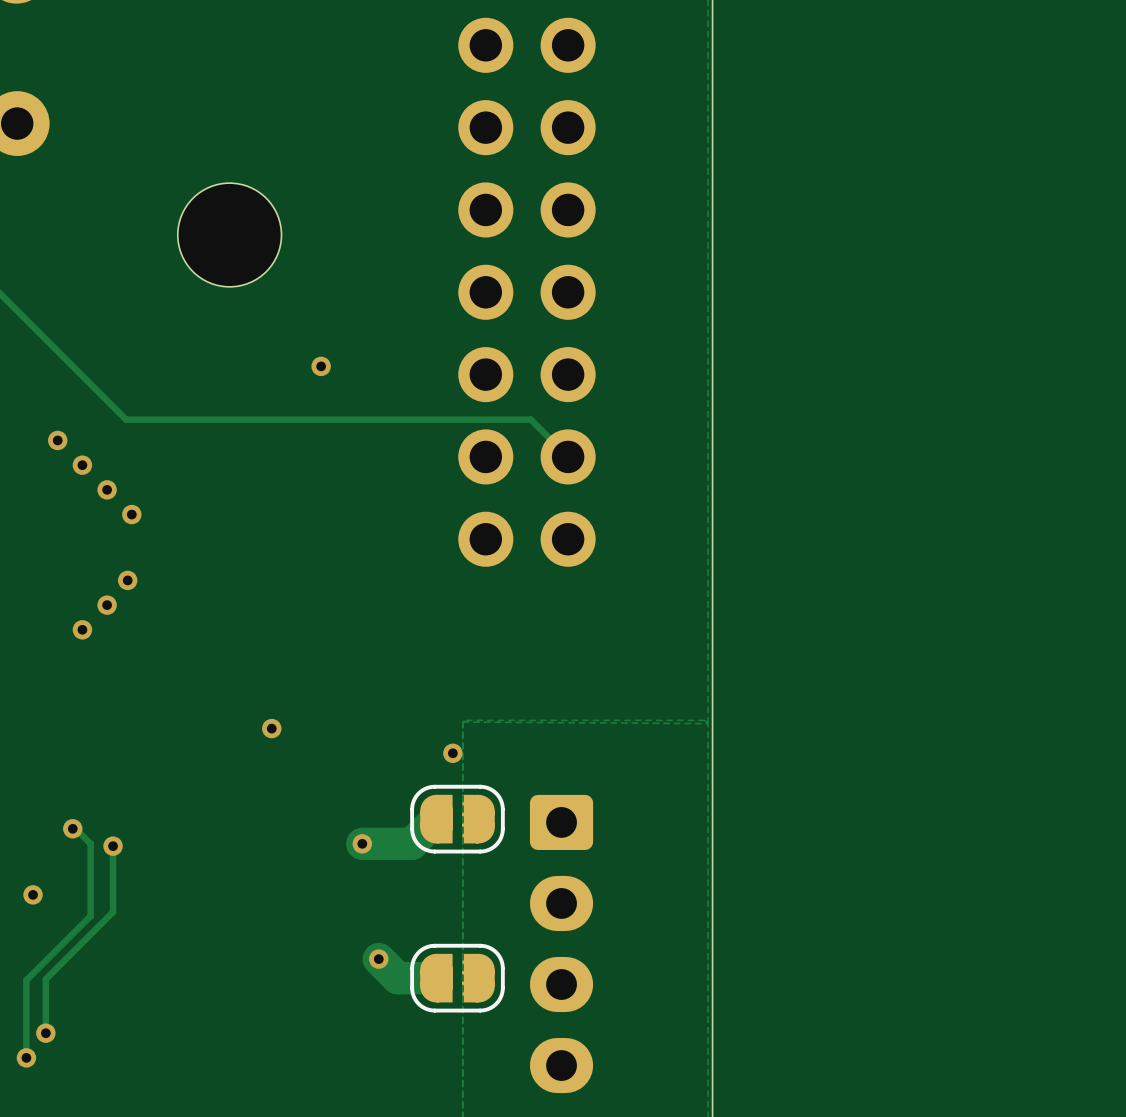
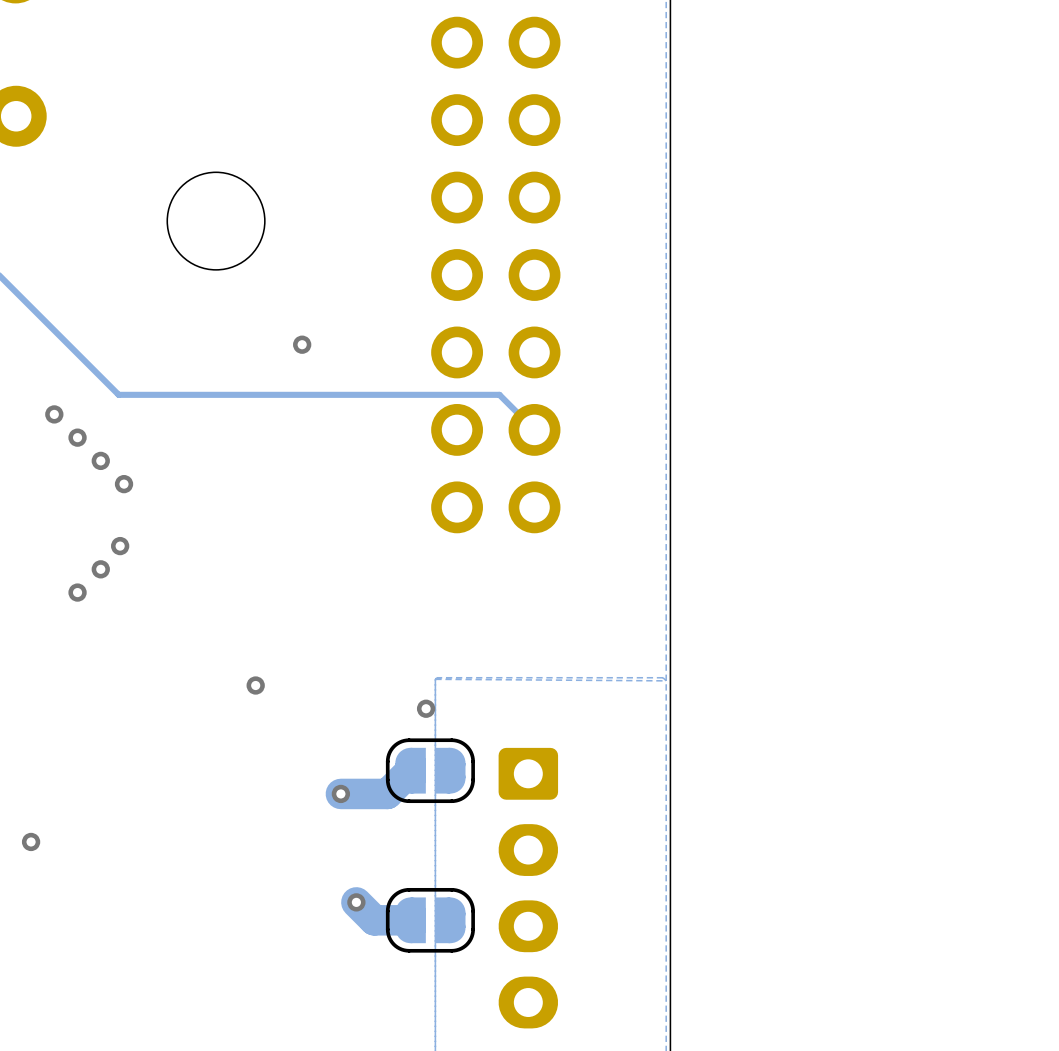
track: (72, 828) (75, 828) (90, 843) (90, 916) (26, 980) (26, 1057) -> none
via: (72, 828) -> none
track: (113, 846) (113, 912) (45, 979) (45, 1033) -> none
via: (113, 846) -> none
via: (45, 1033) -> none
via: (26, 1057) -> none

